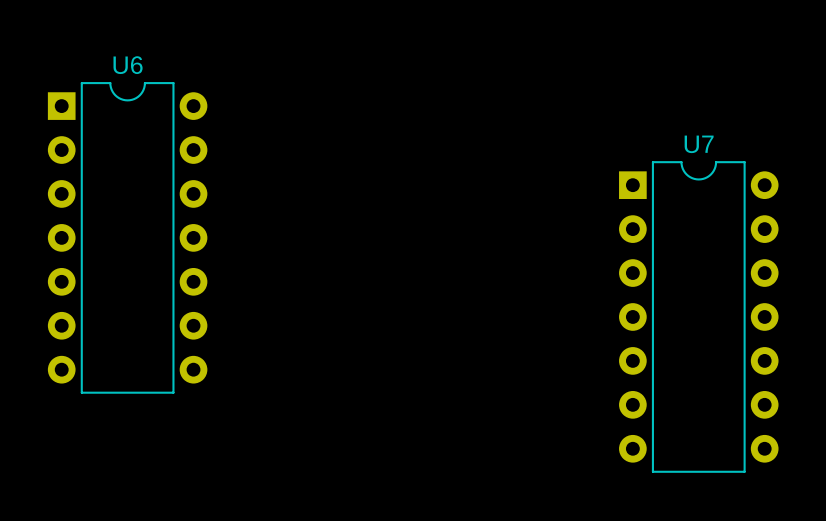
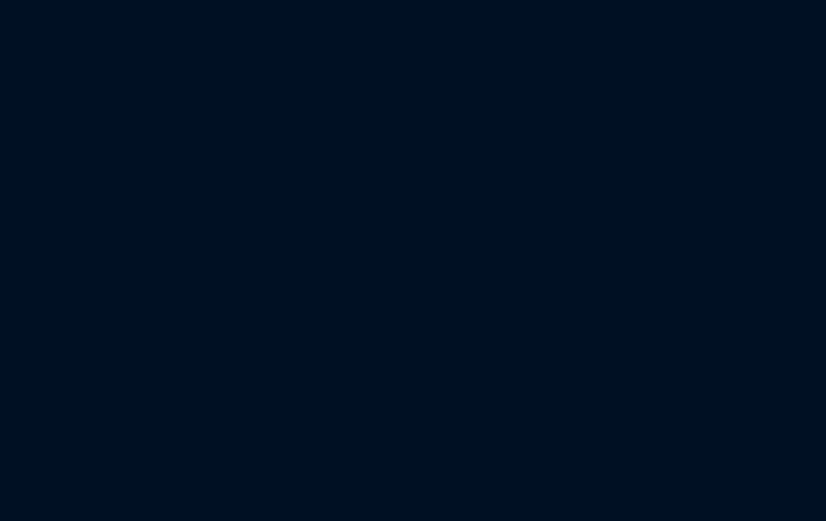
U6: (127, 237) -> none
U7: (698, 316) -> none

